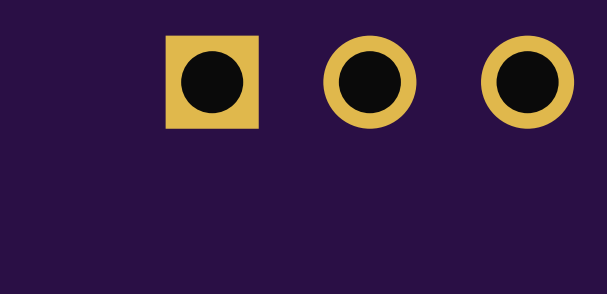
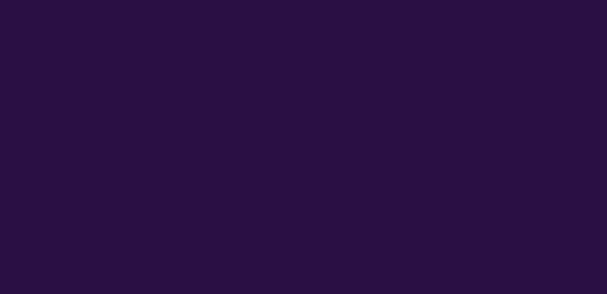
part: (369, 82) -> none

